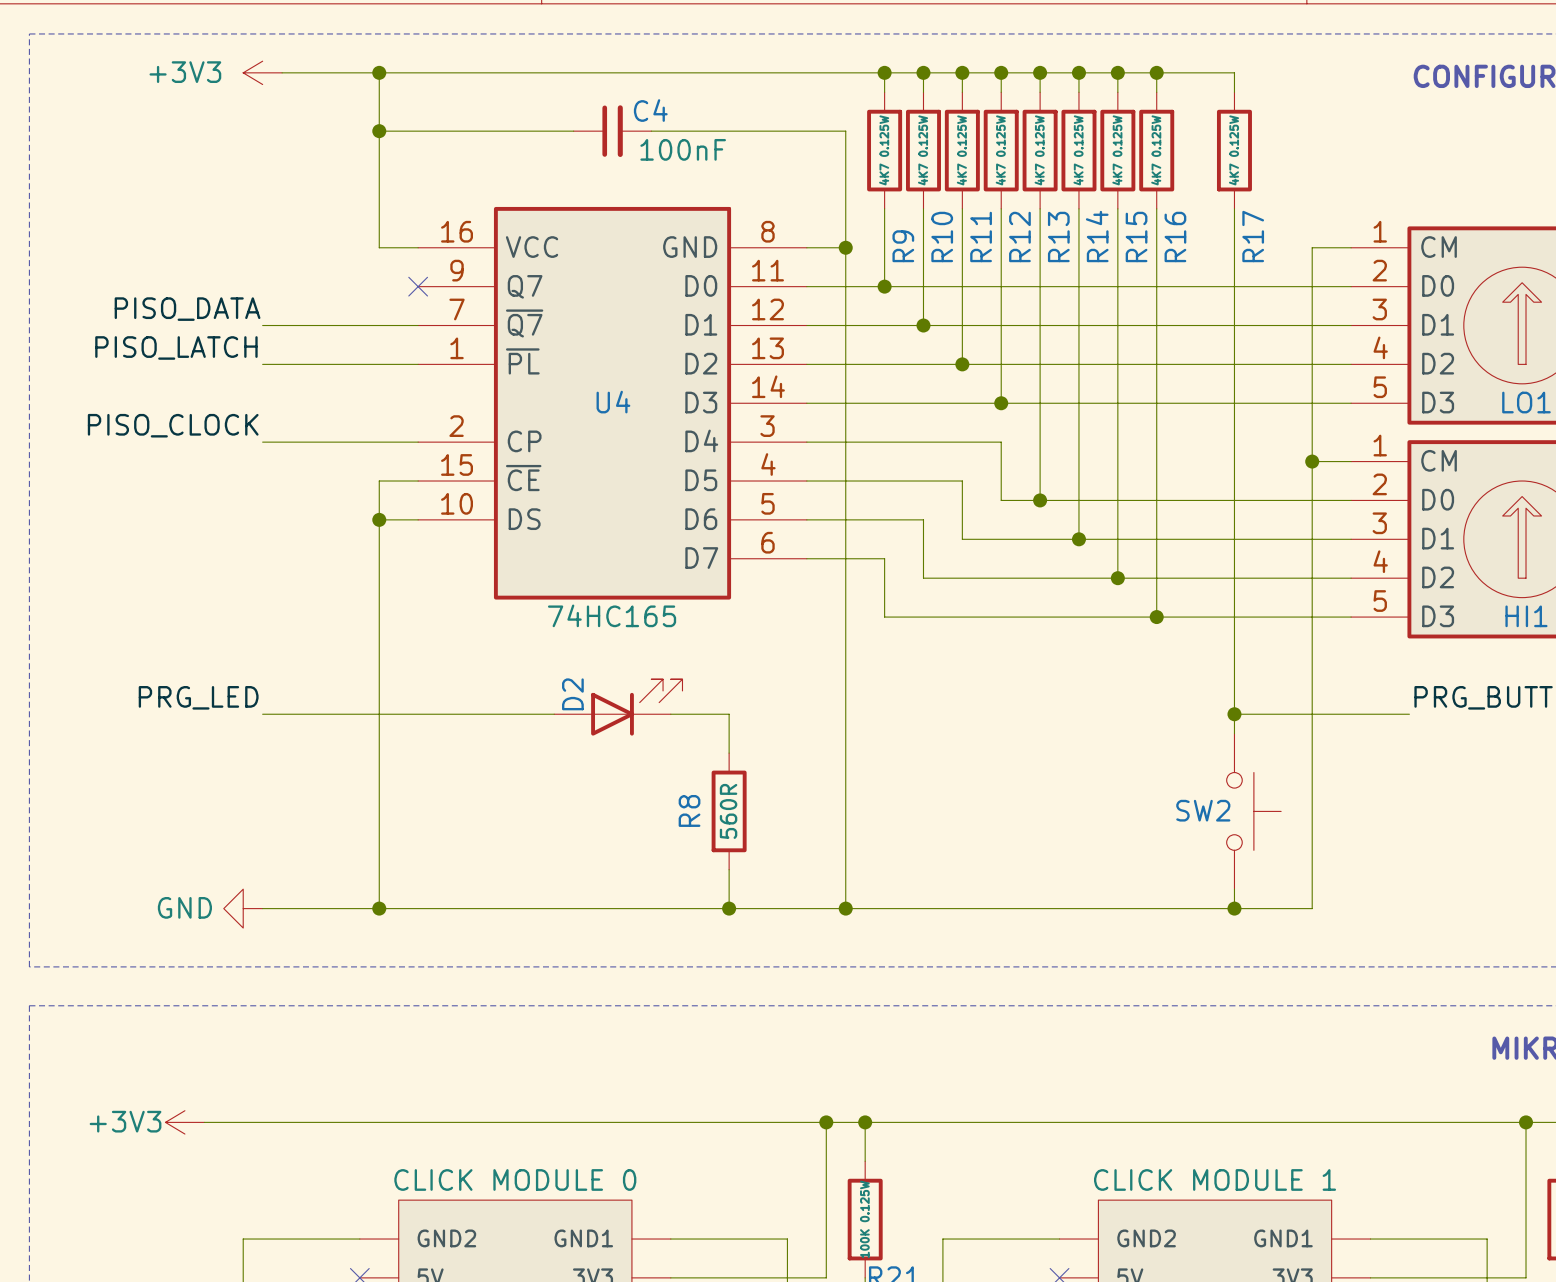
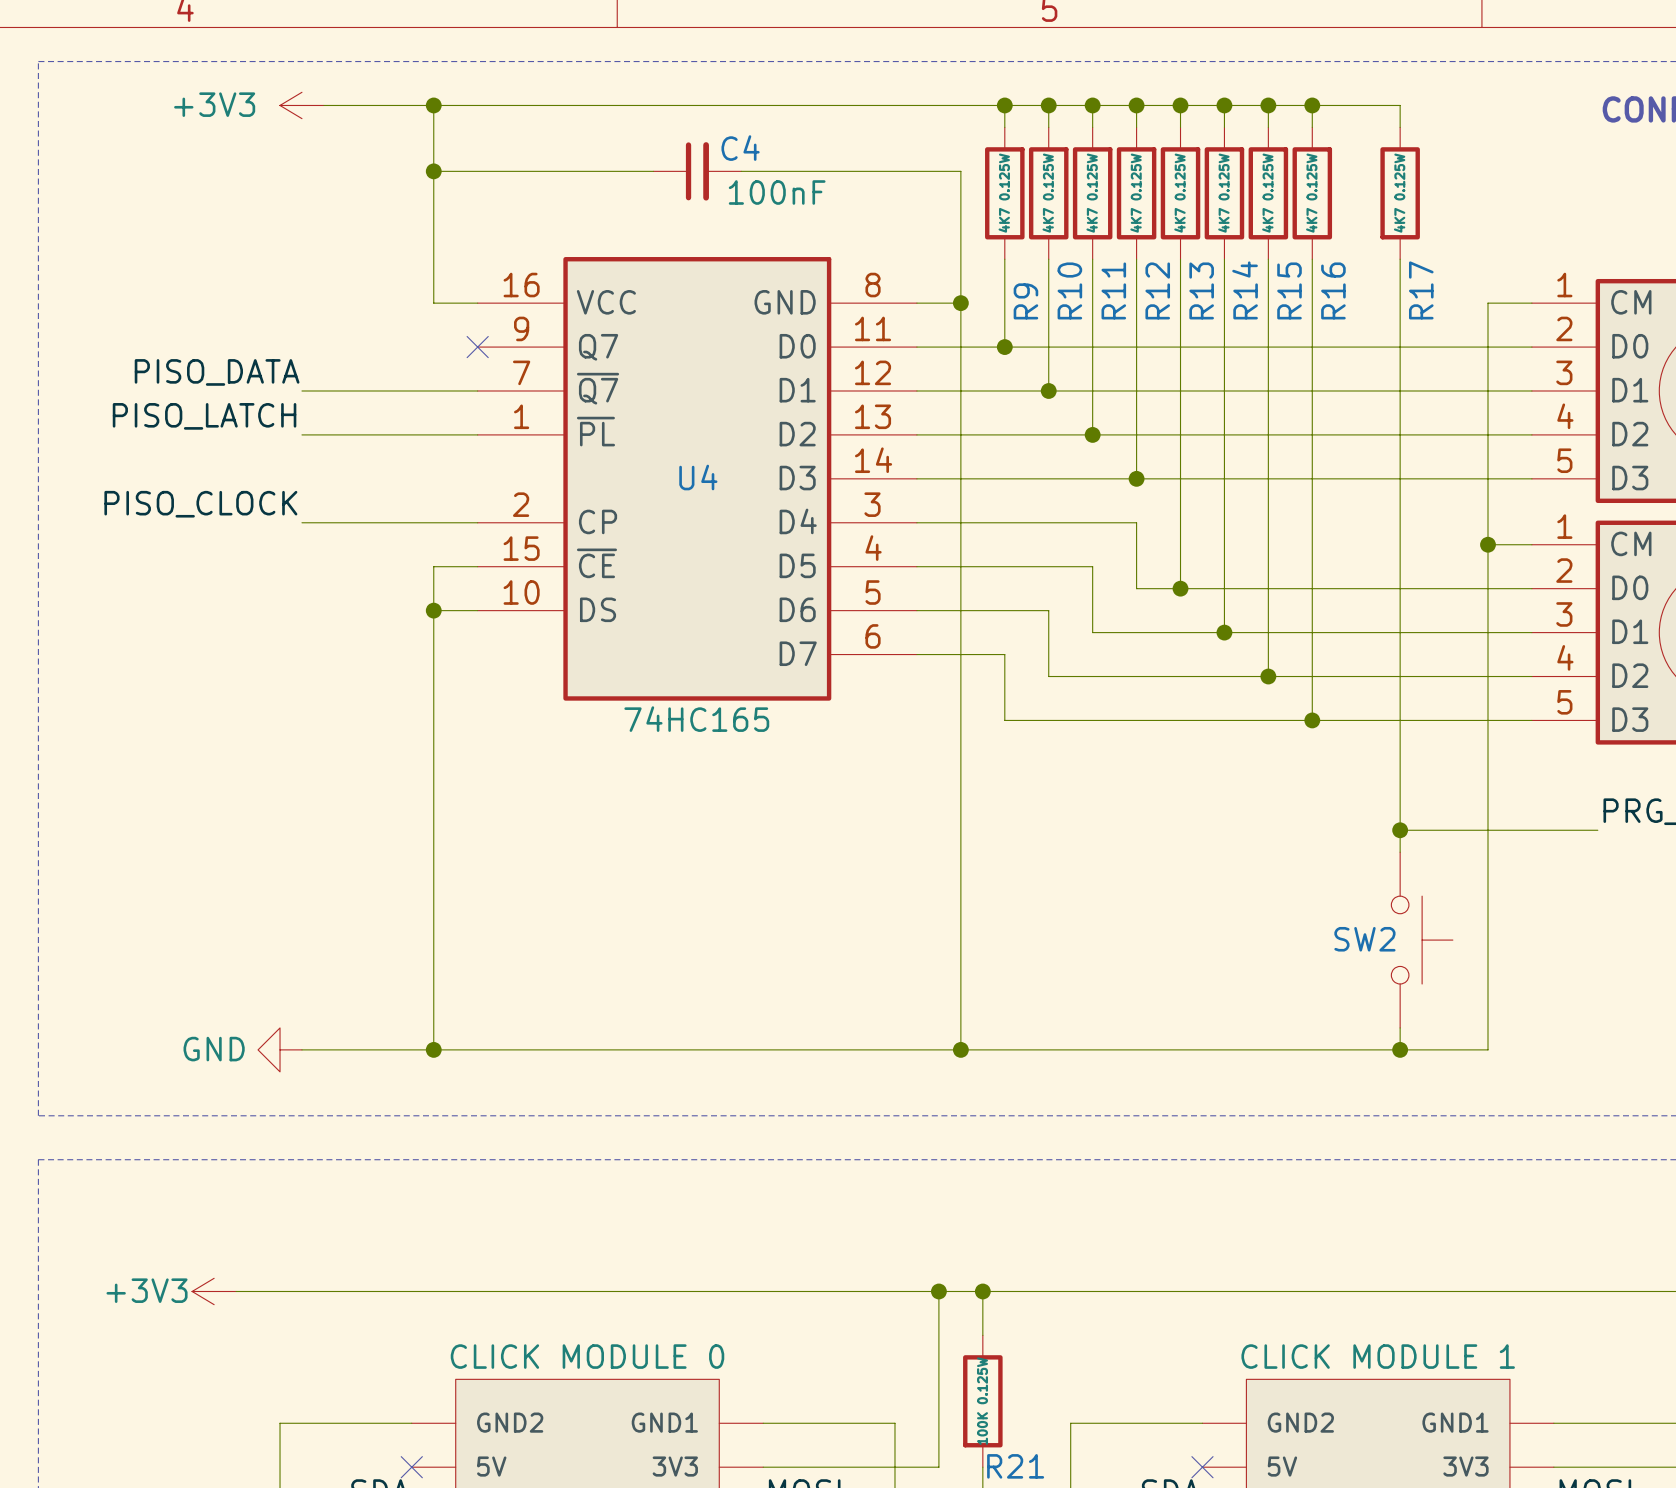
label: PRG_LED (198, 697) -> none
D2: (618, 707) -> none
wire: (262, 714) (554, 714) -> none
wire: (670, 714) (729, 714) (729, 753) -> none
R8: 560R (729, 811) -> none
wire: (729, 869) (729, 908) -> none
junction: (729, 908) -> none

